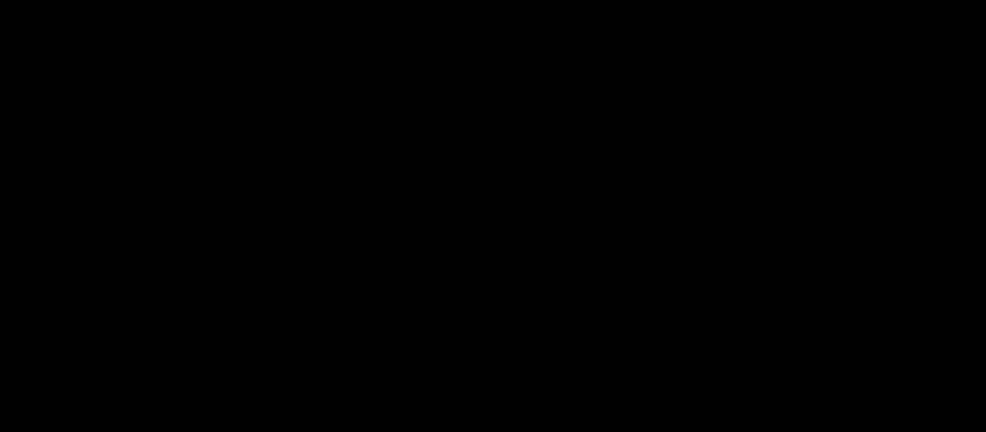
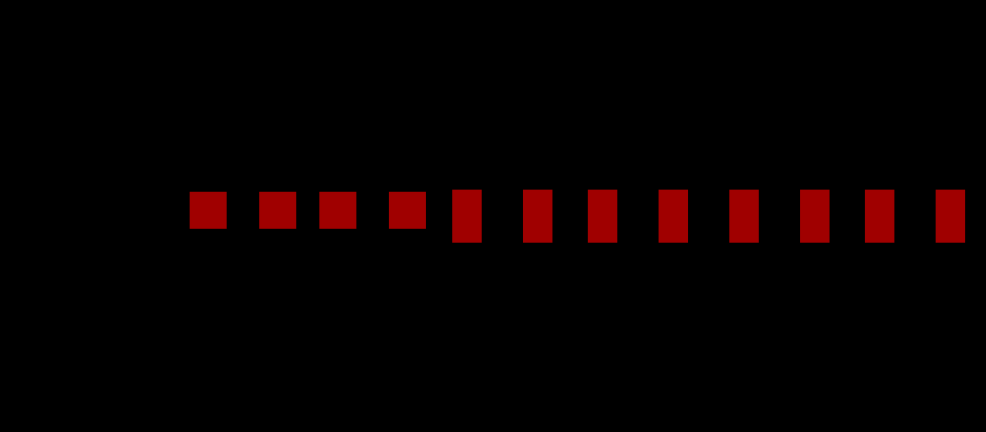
part: none -> (242, 210)
part: none -> (372, 210)
part: none -> (502, 216)
part: none -> (637, 216)
part: none -> (779, 216)
part: none -> (915, 216)

